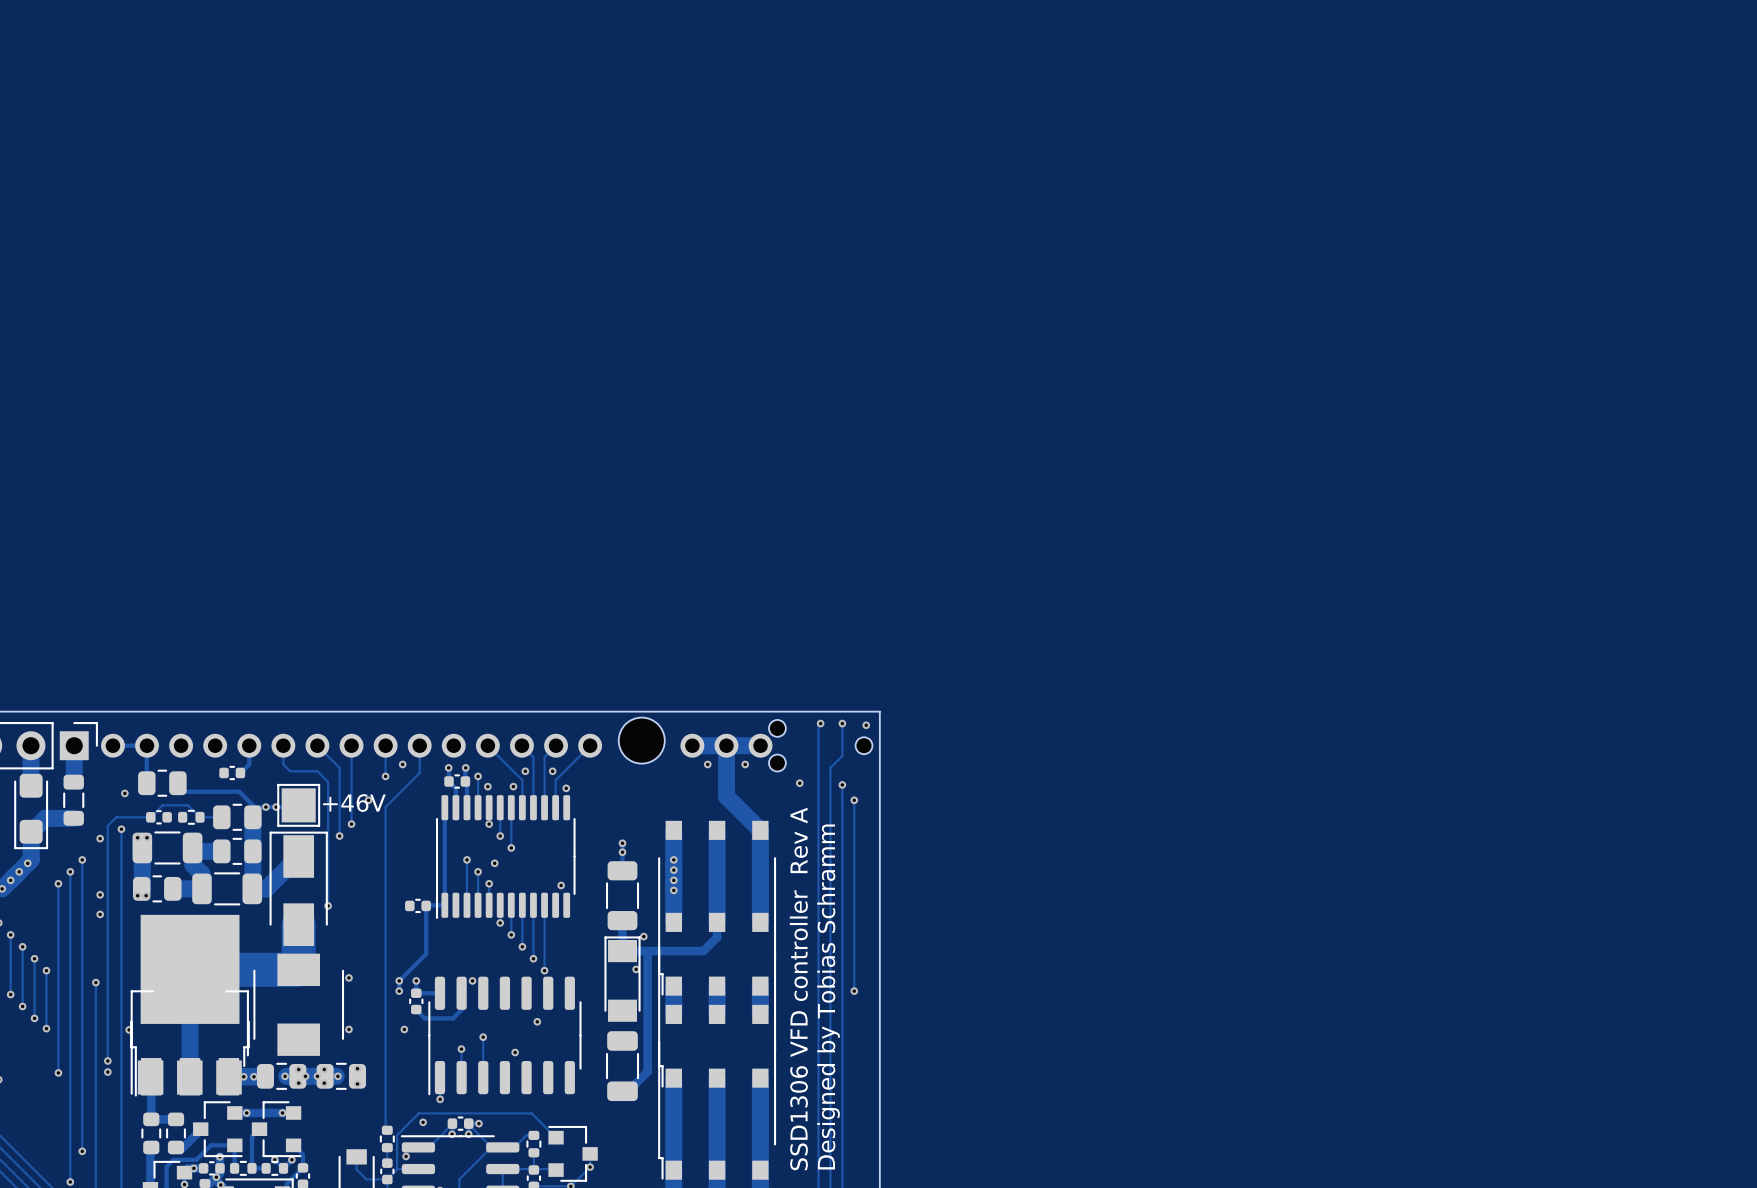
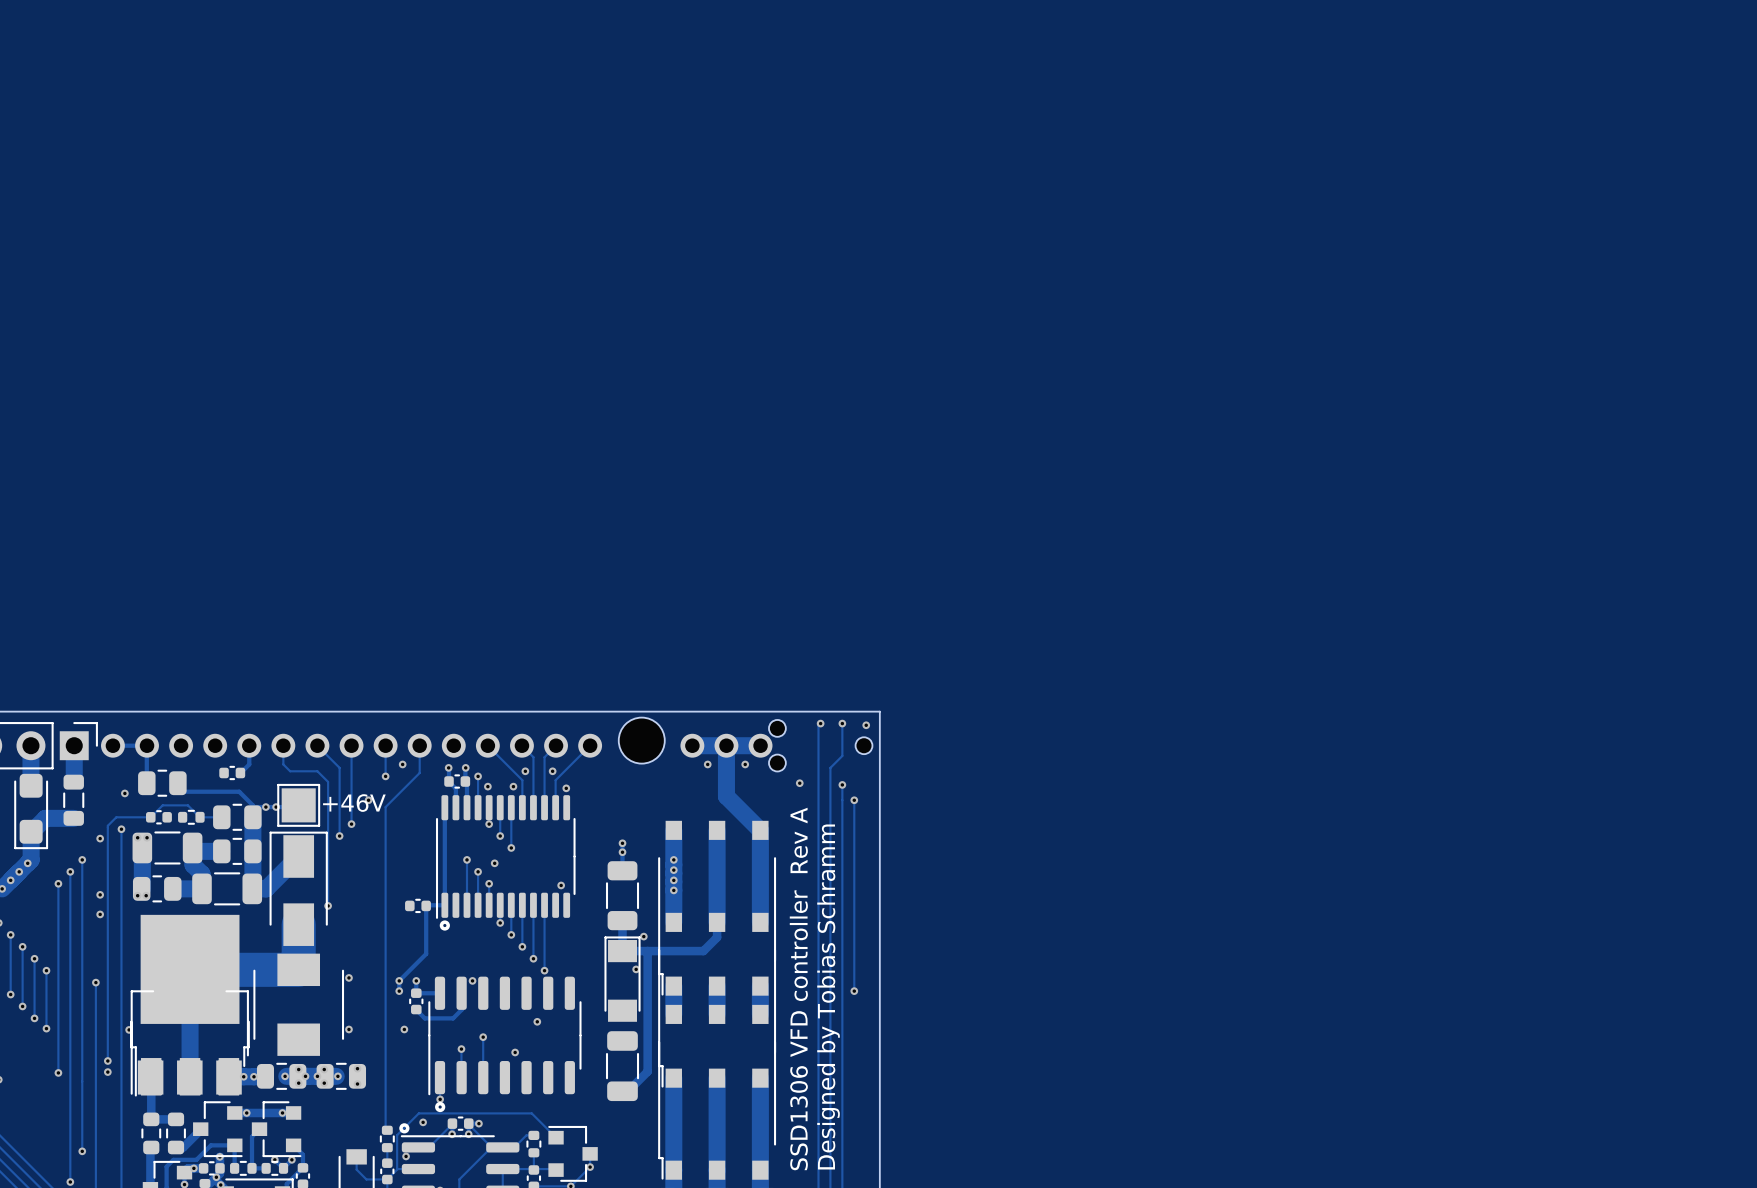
drawing: none -> [439, 920, 450, 931]
drawing: none -> [435, 1101, 446, 1113]
drawing: none -> [399, 1123, 410, 1134]

